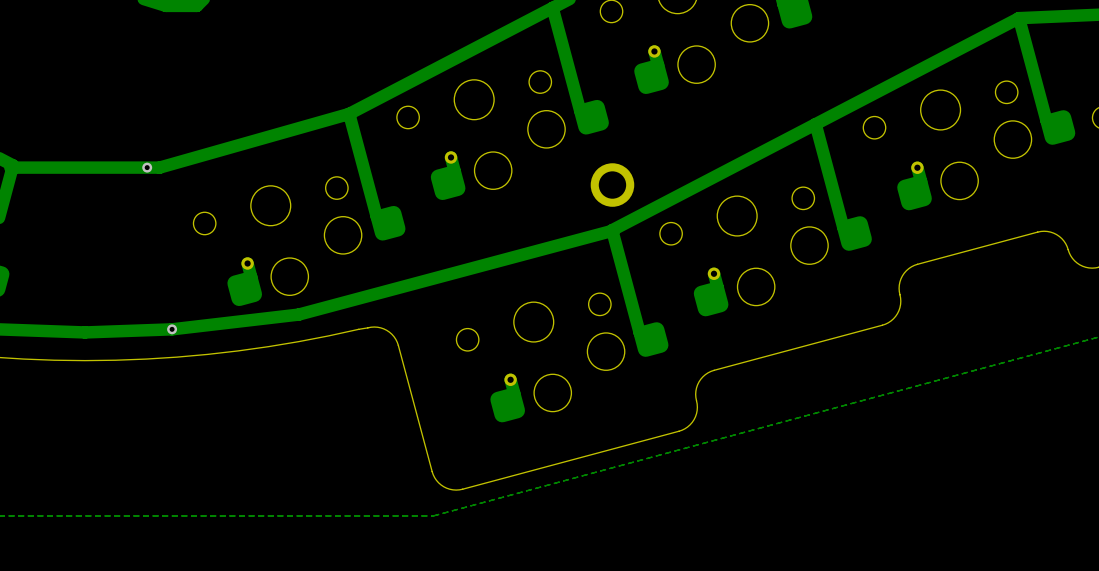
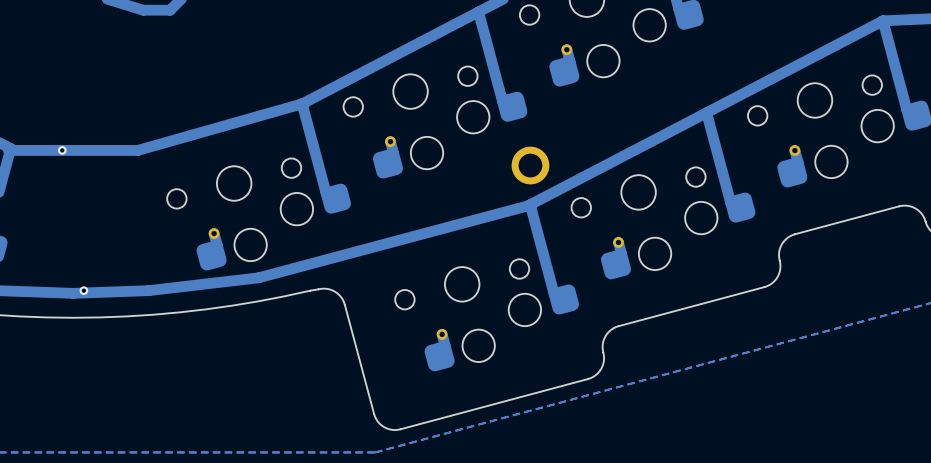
via position: (147, 167) -> (62, 150)
via position: (172, 329) -> (83, 290)

